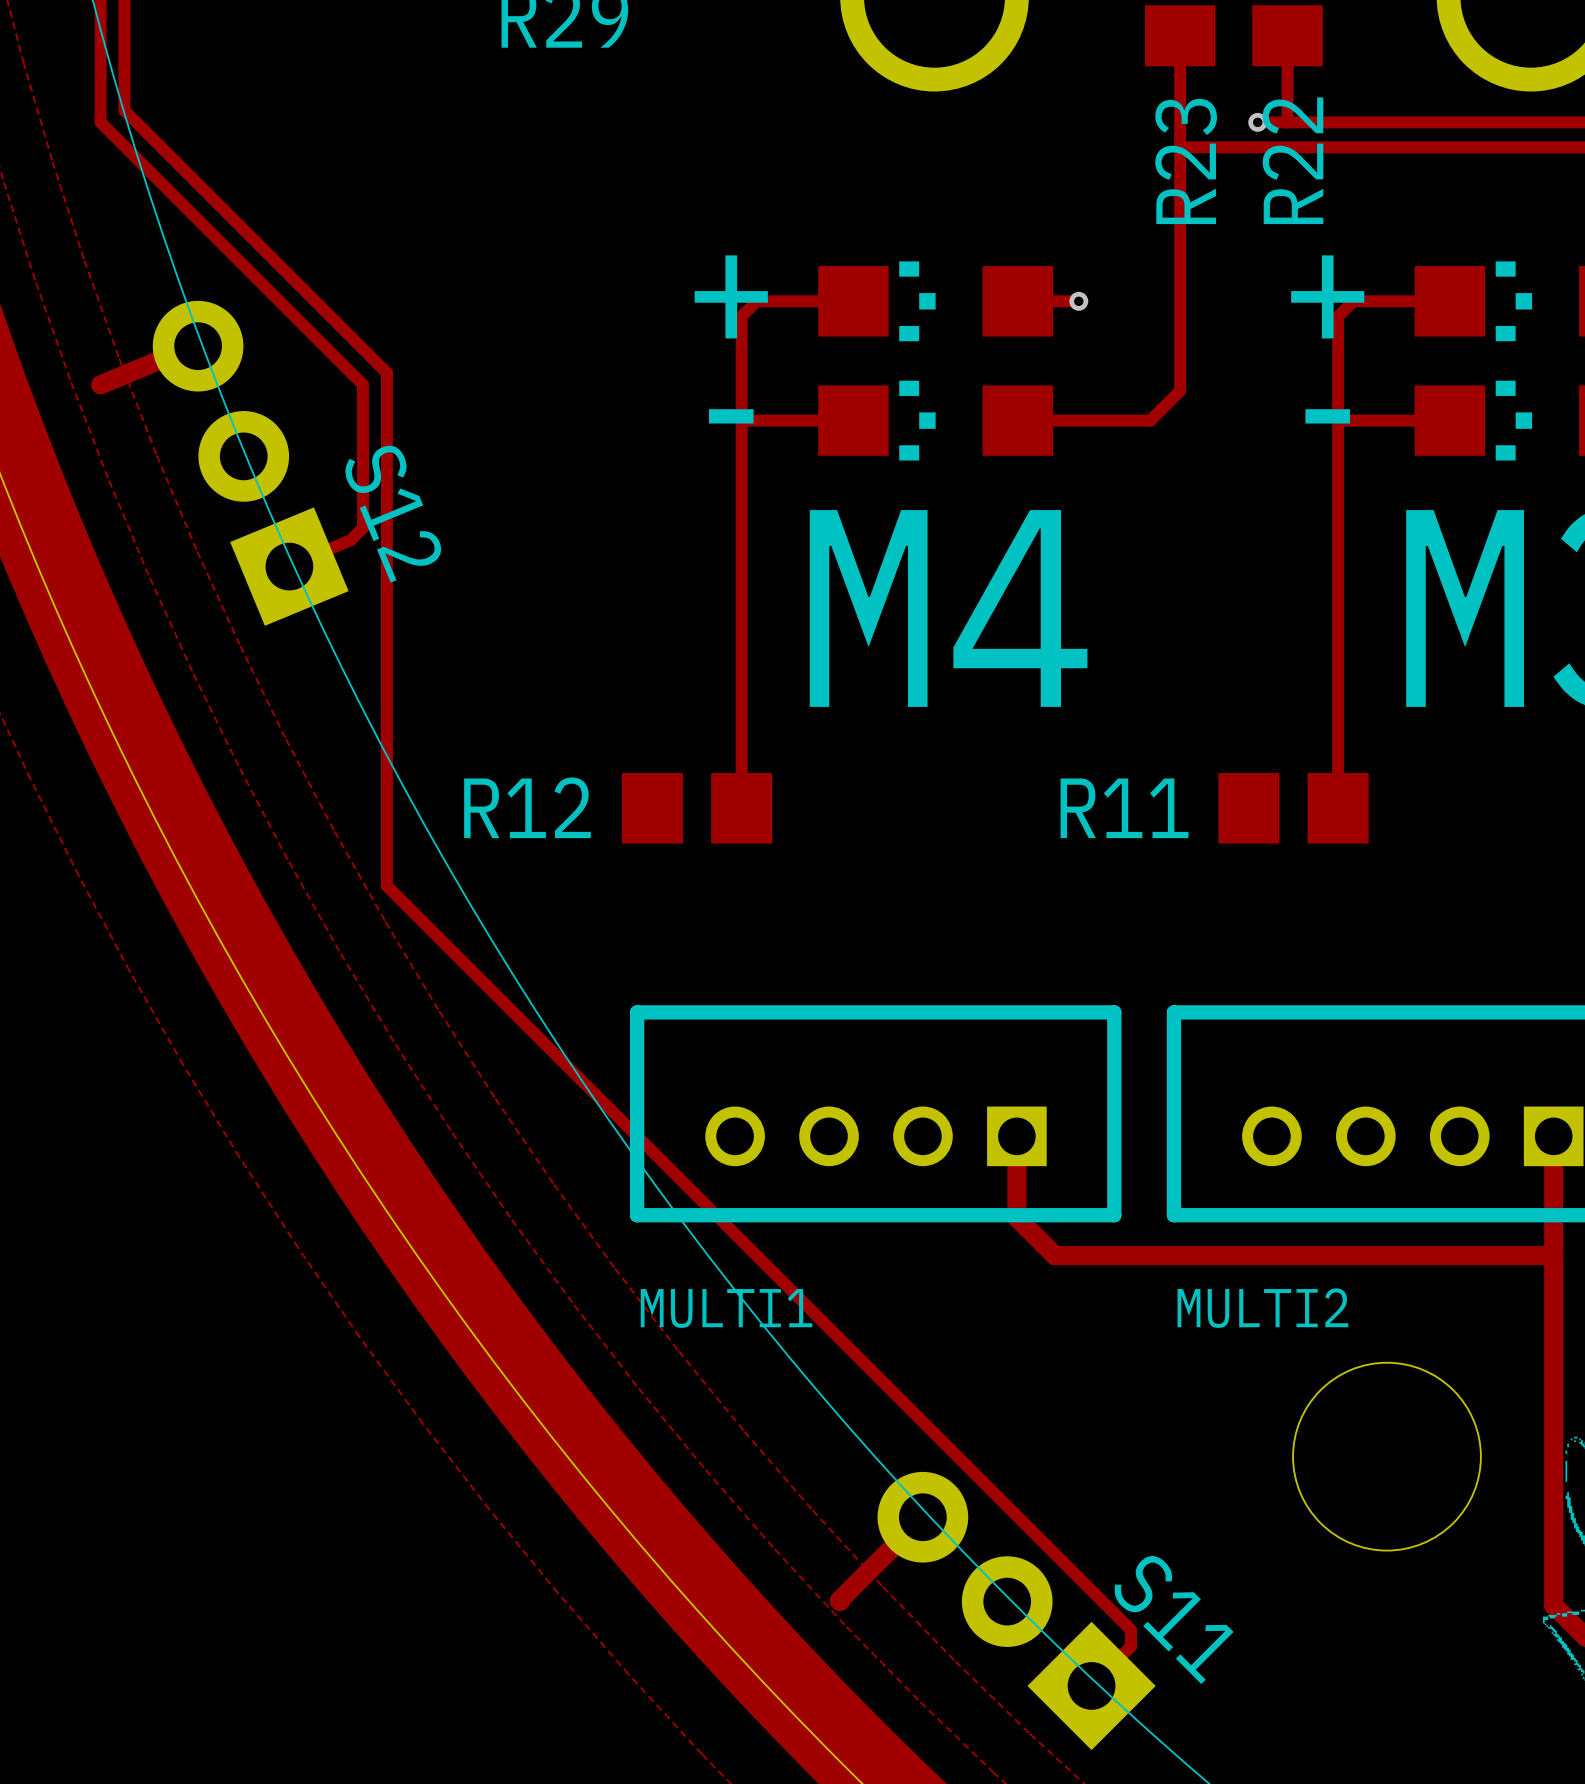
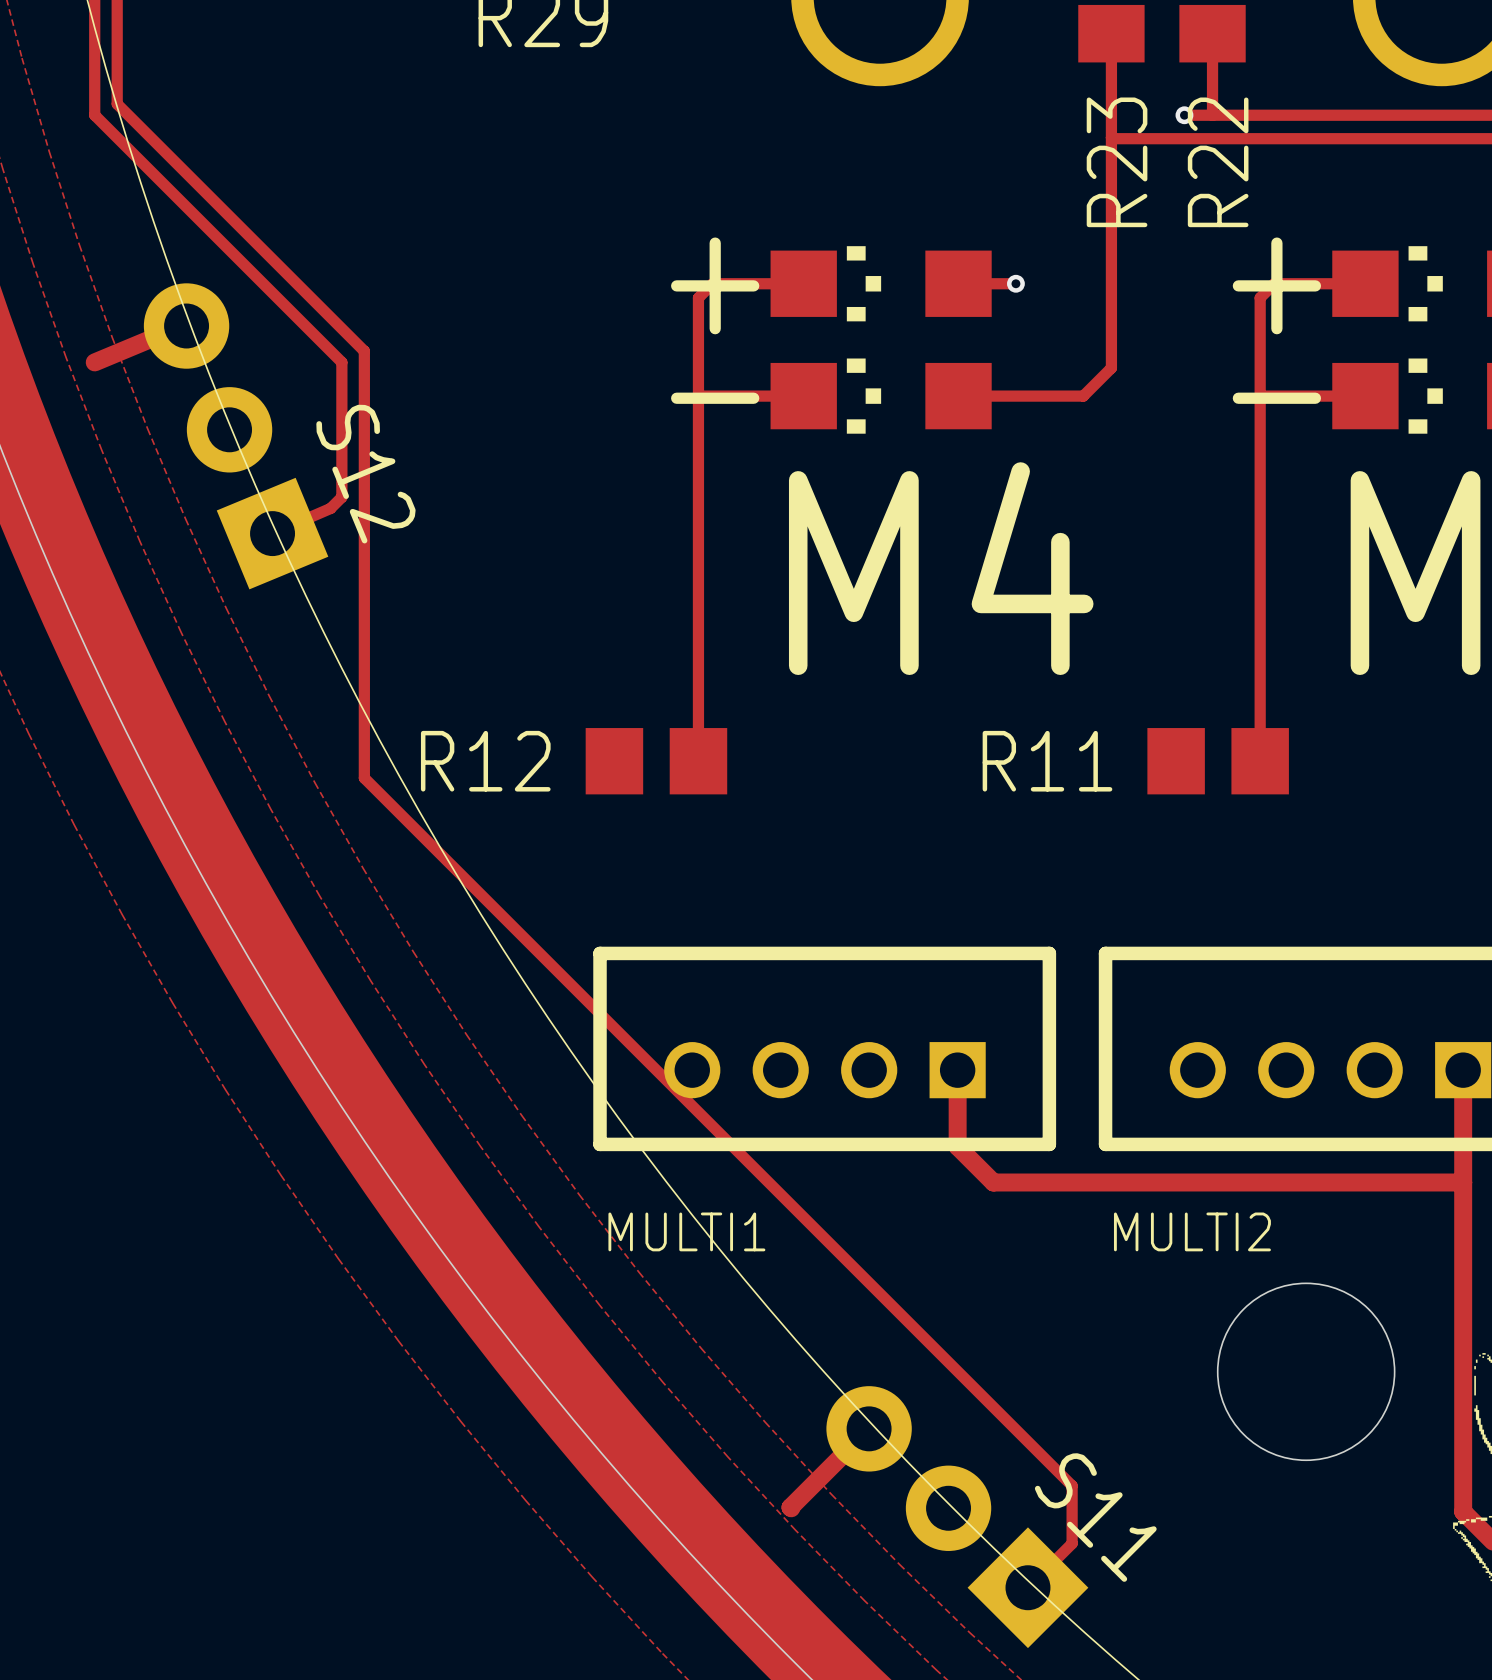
track: (386, 826) (386, 885) (1131, 1630) (1131, 1646) -> (364, 778) (1072, 1485) (1072, 1543) (1065, 1550)

